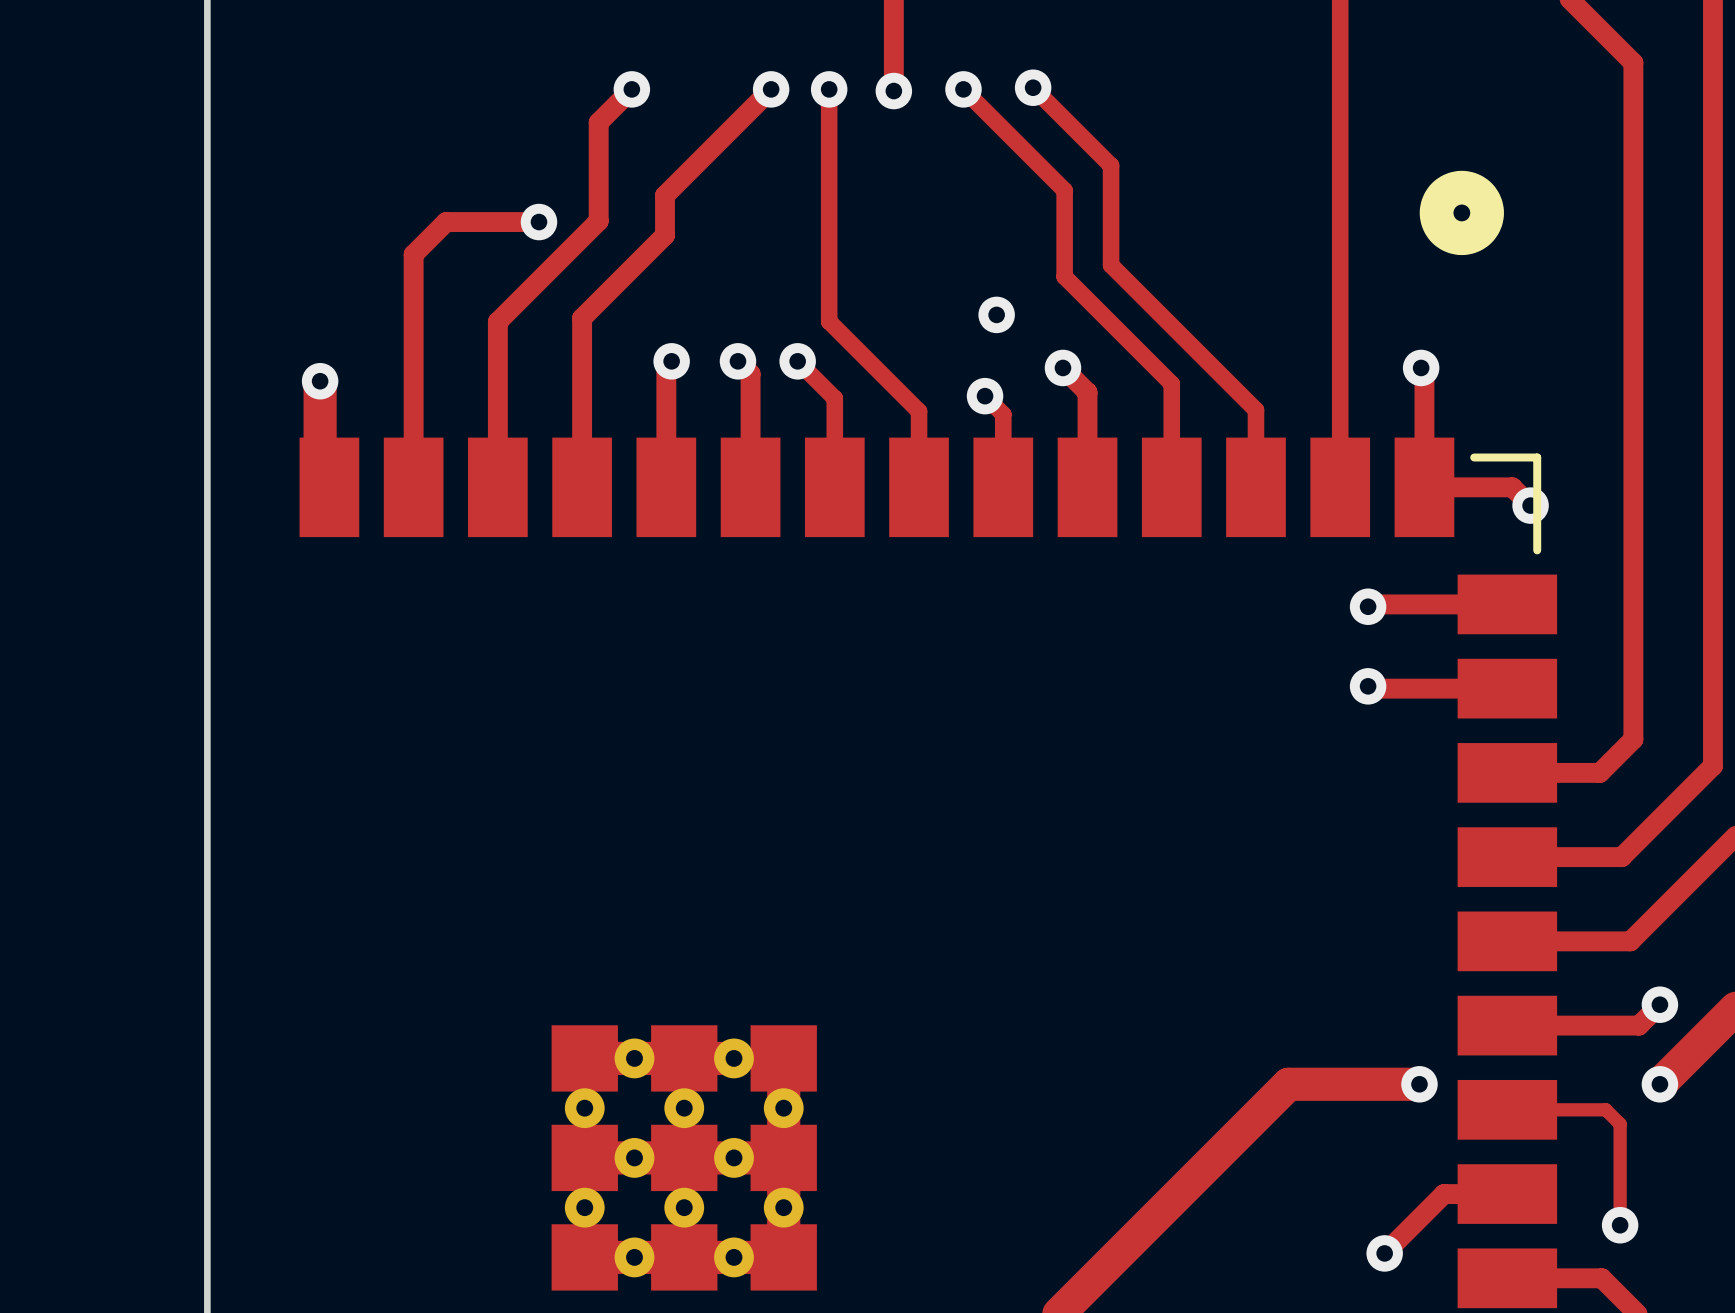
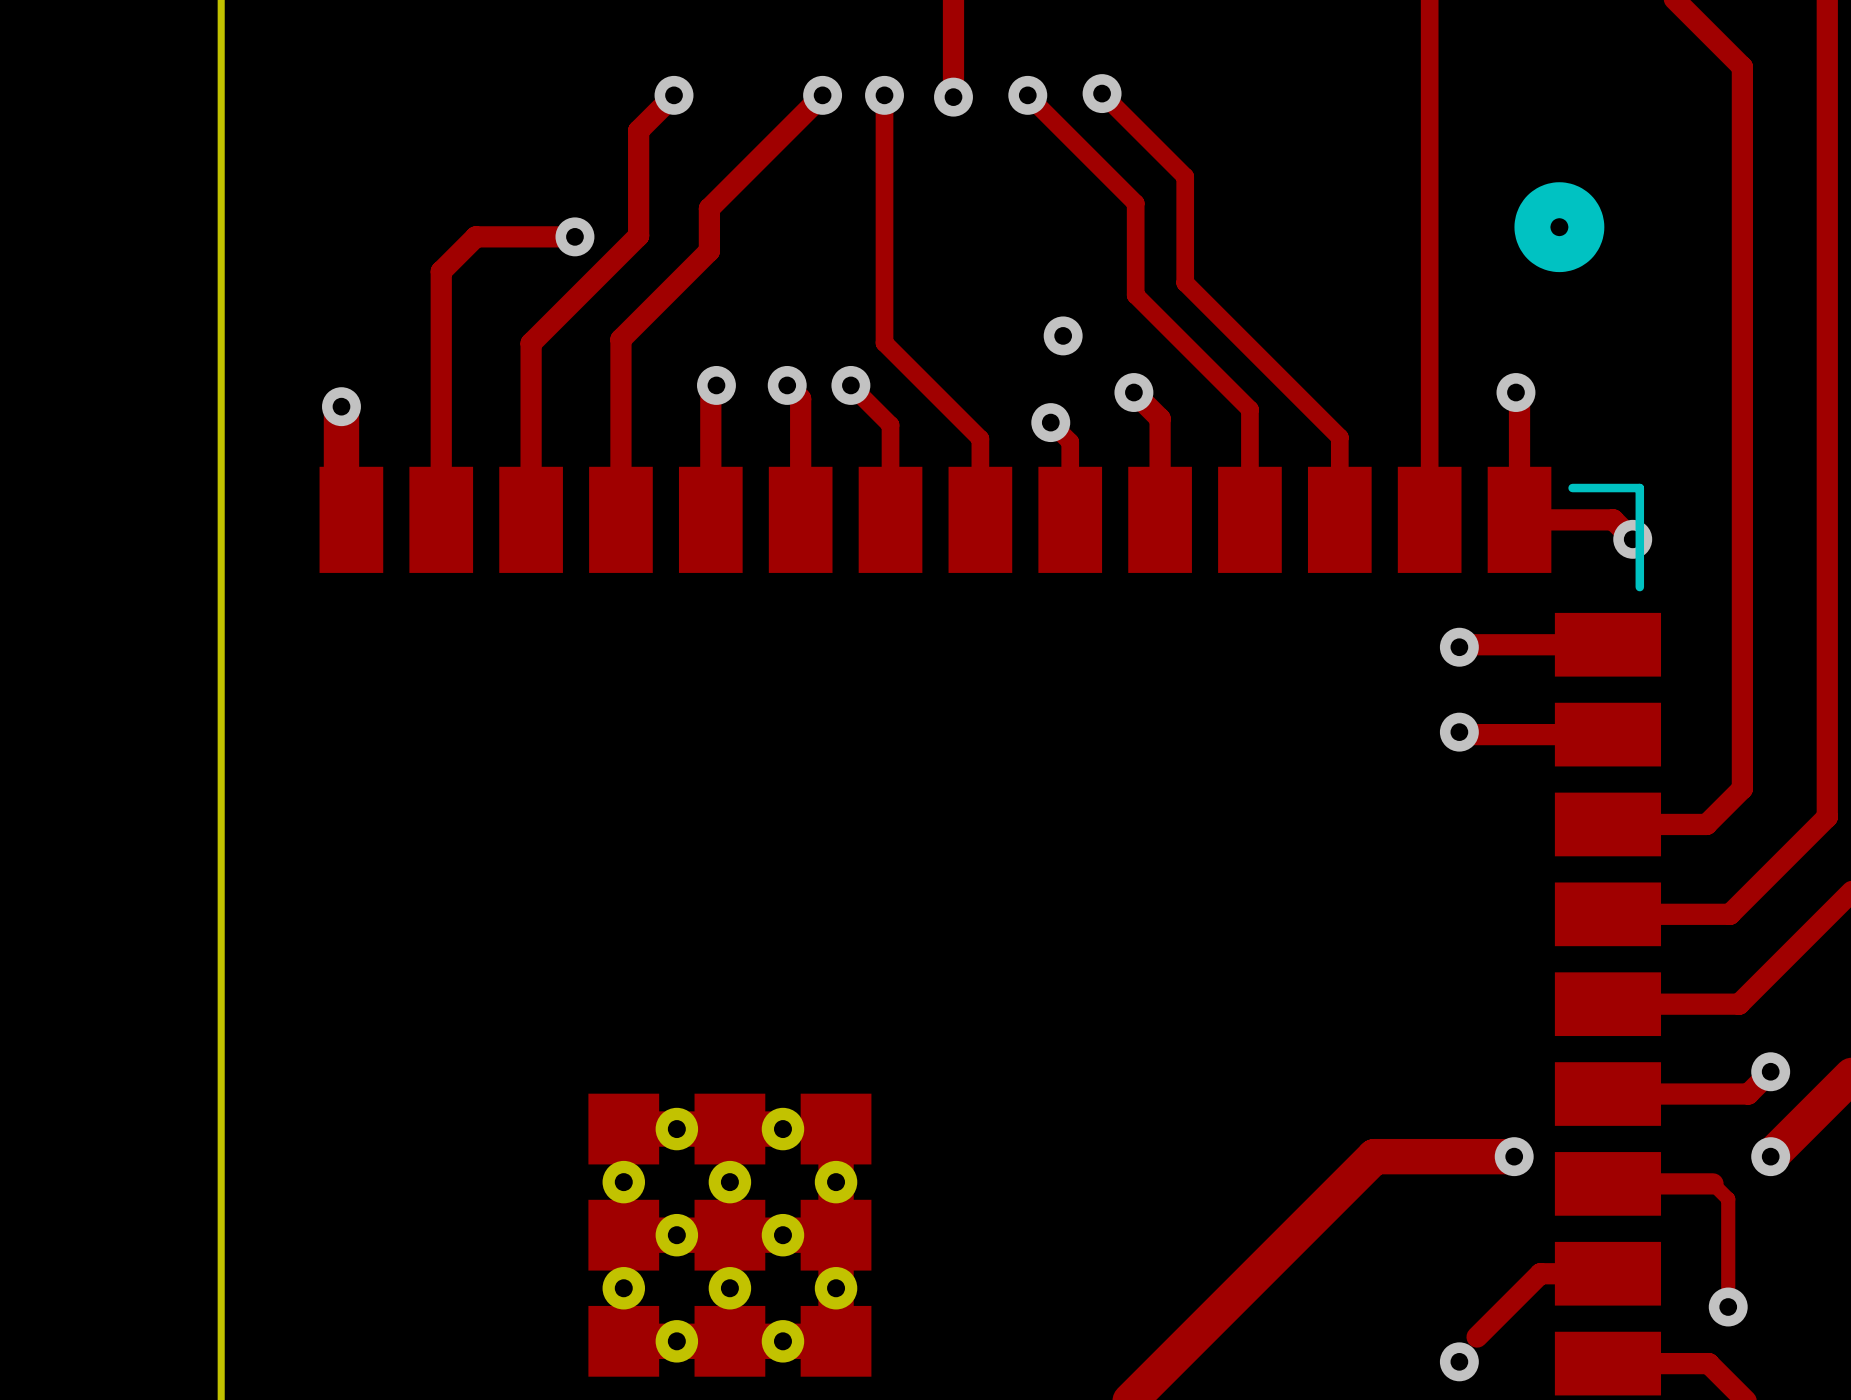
track width: thin (1507, 1109) (1605, 1109) -> thick (1607, 1183) (1713, 1183)
via position: (1384, 1253) -> (1459, 1361)

